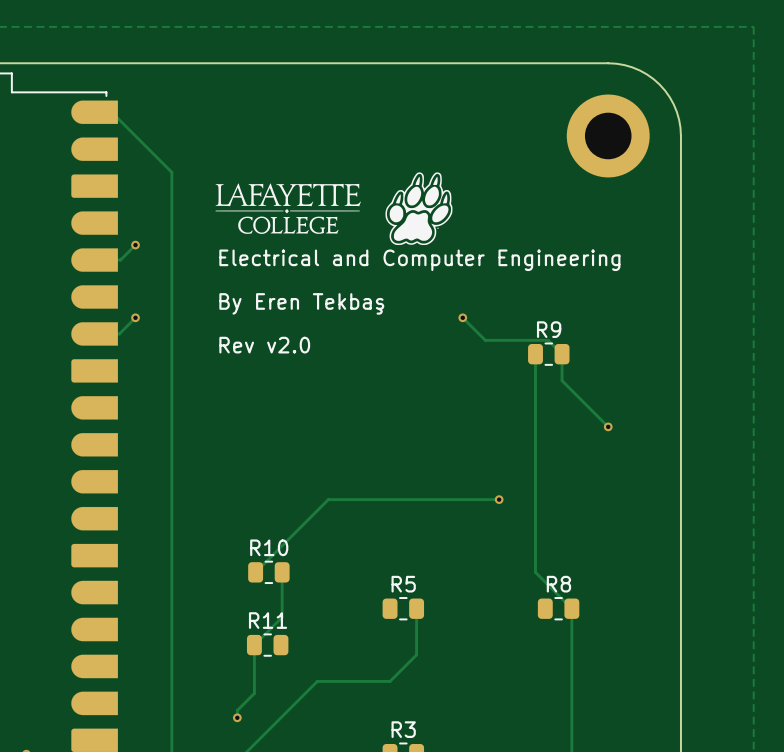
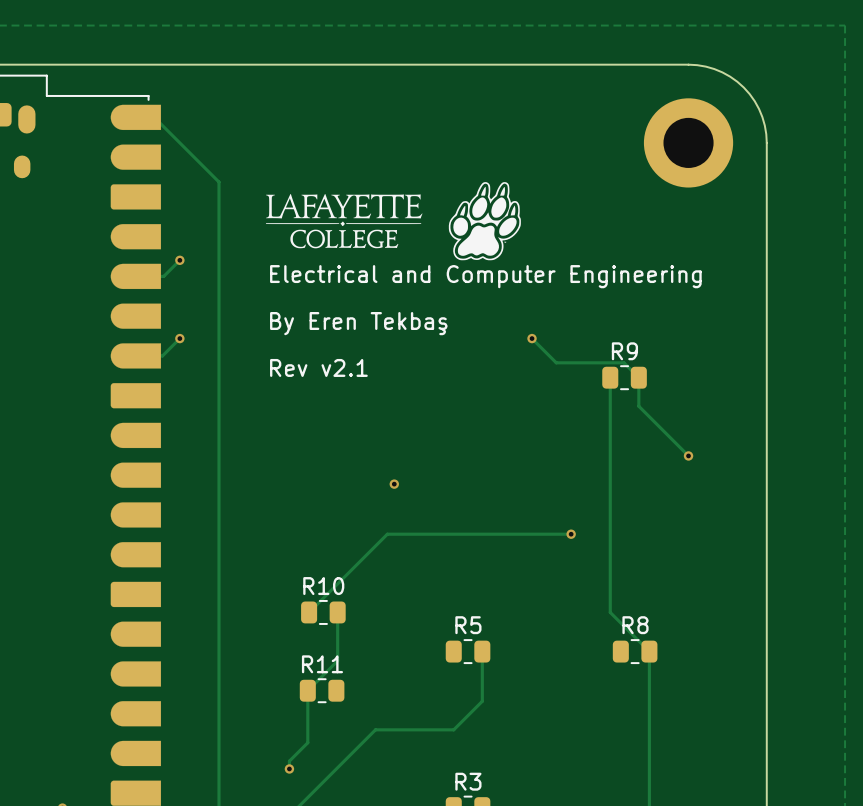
text: Rev v2.0 (264, 345) -> Rev v2.1 (318, 367)
via: none -> (394, 484)

